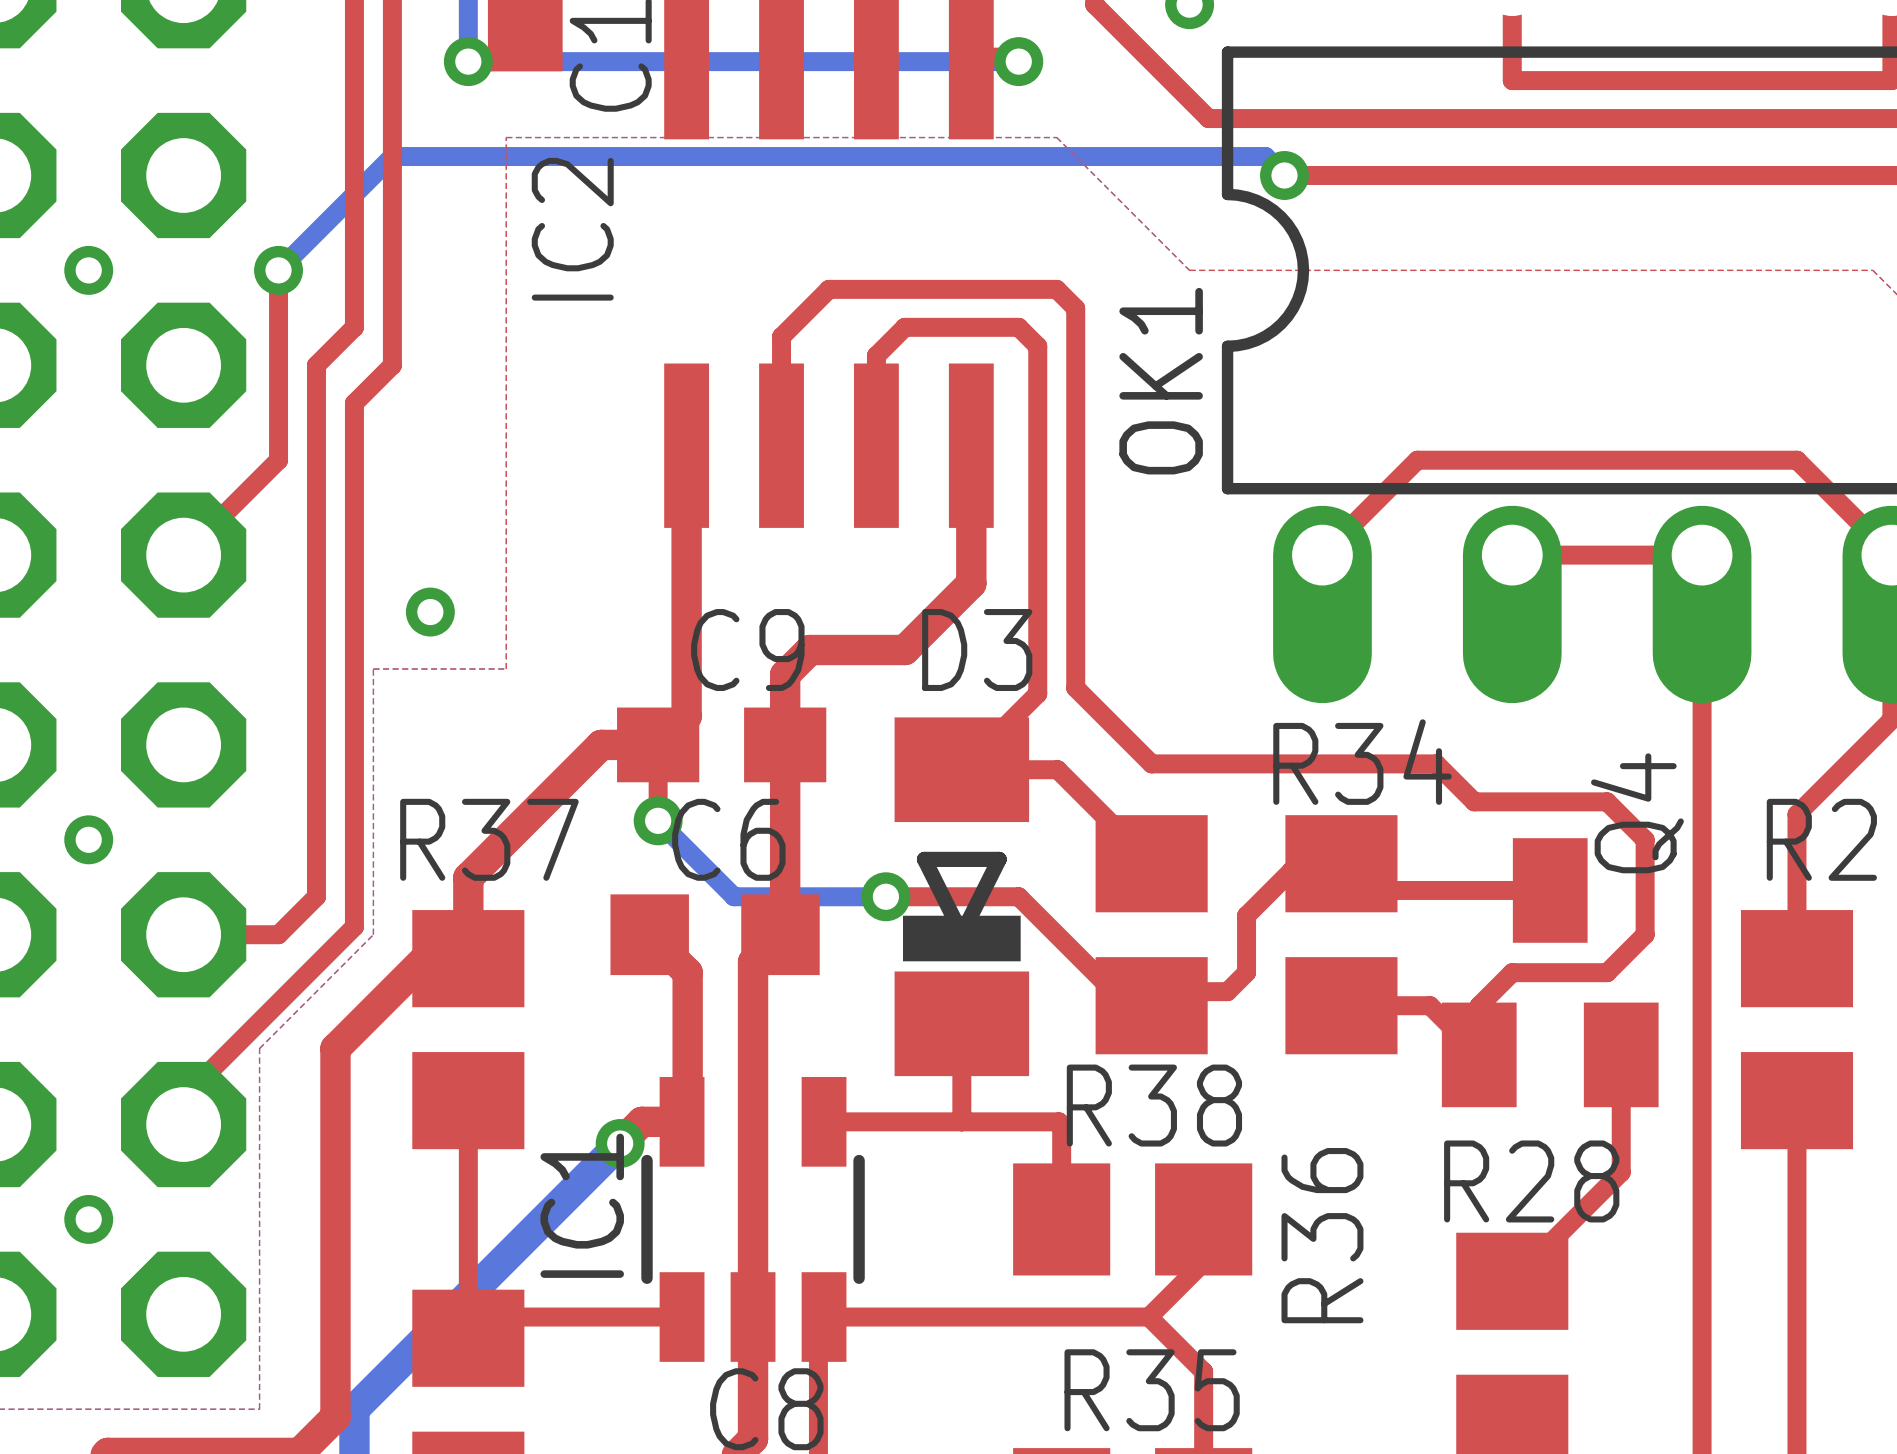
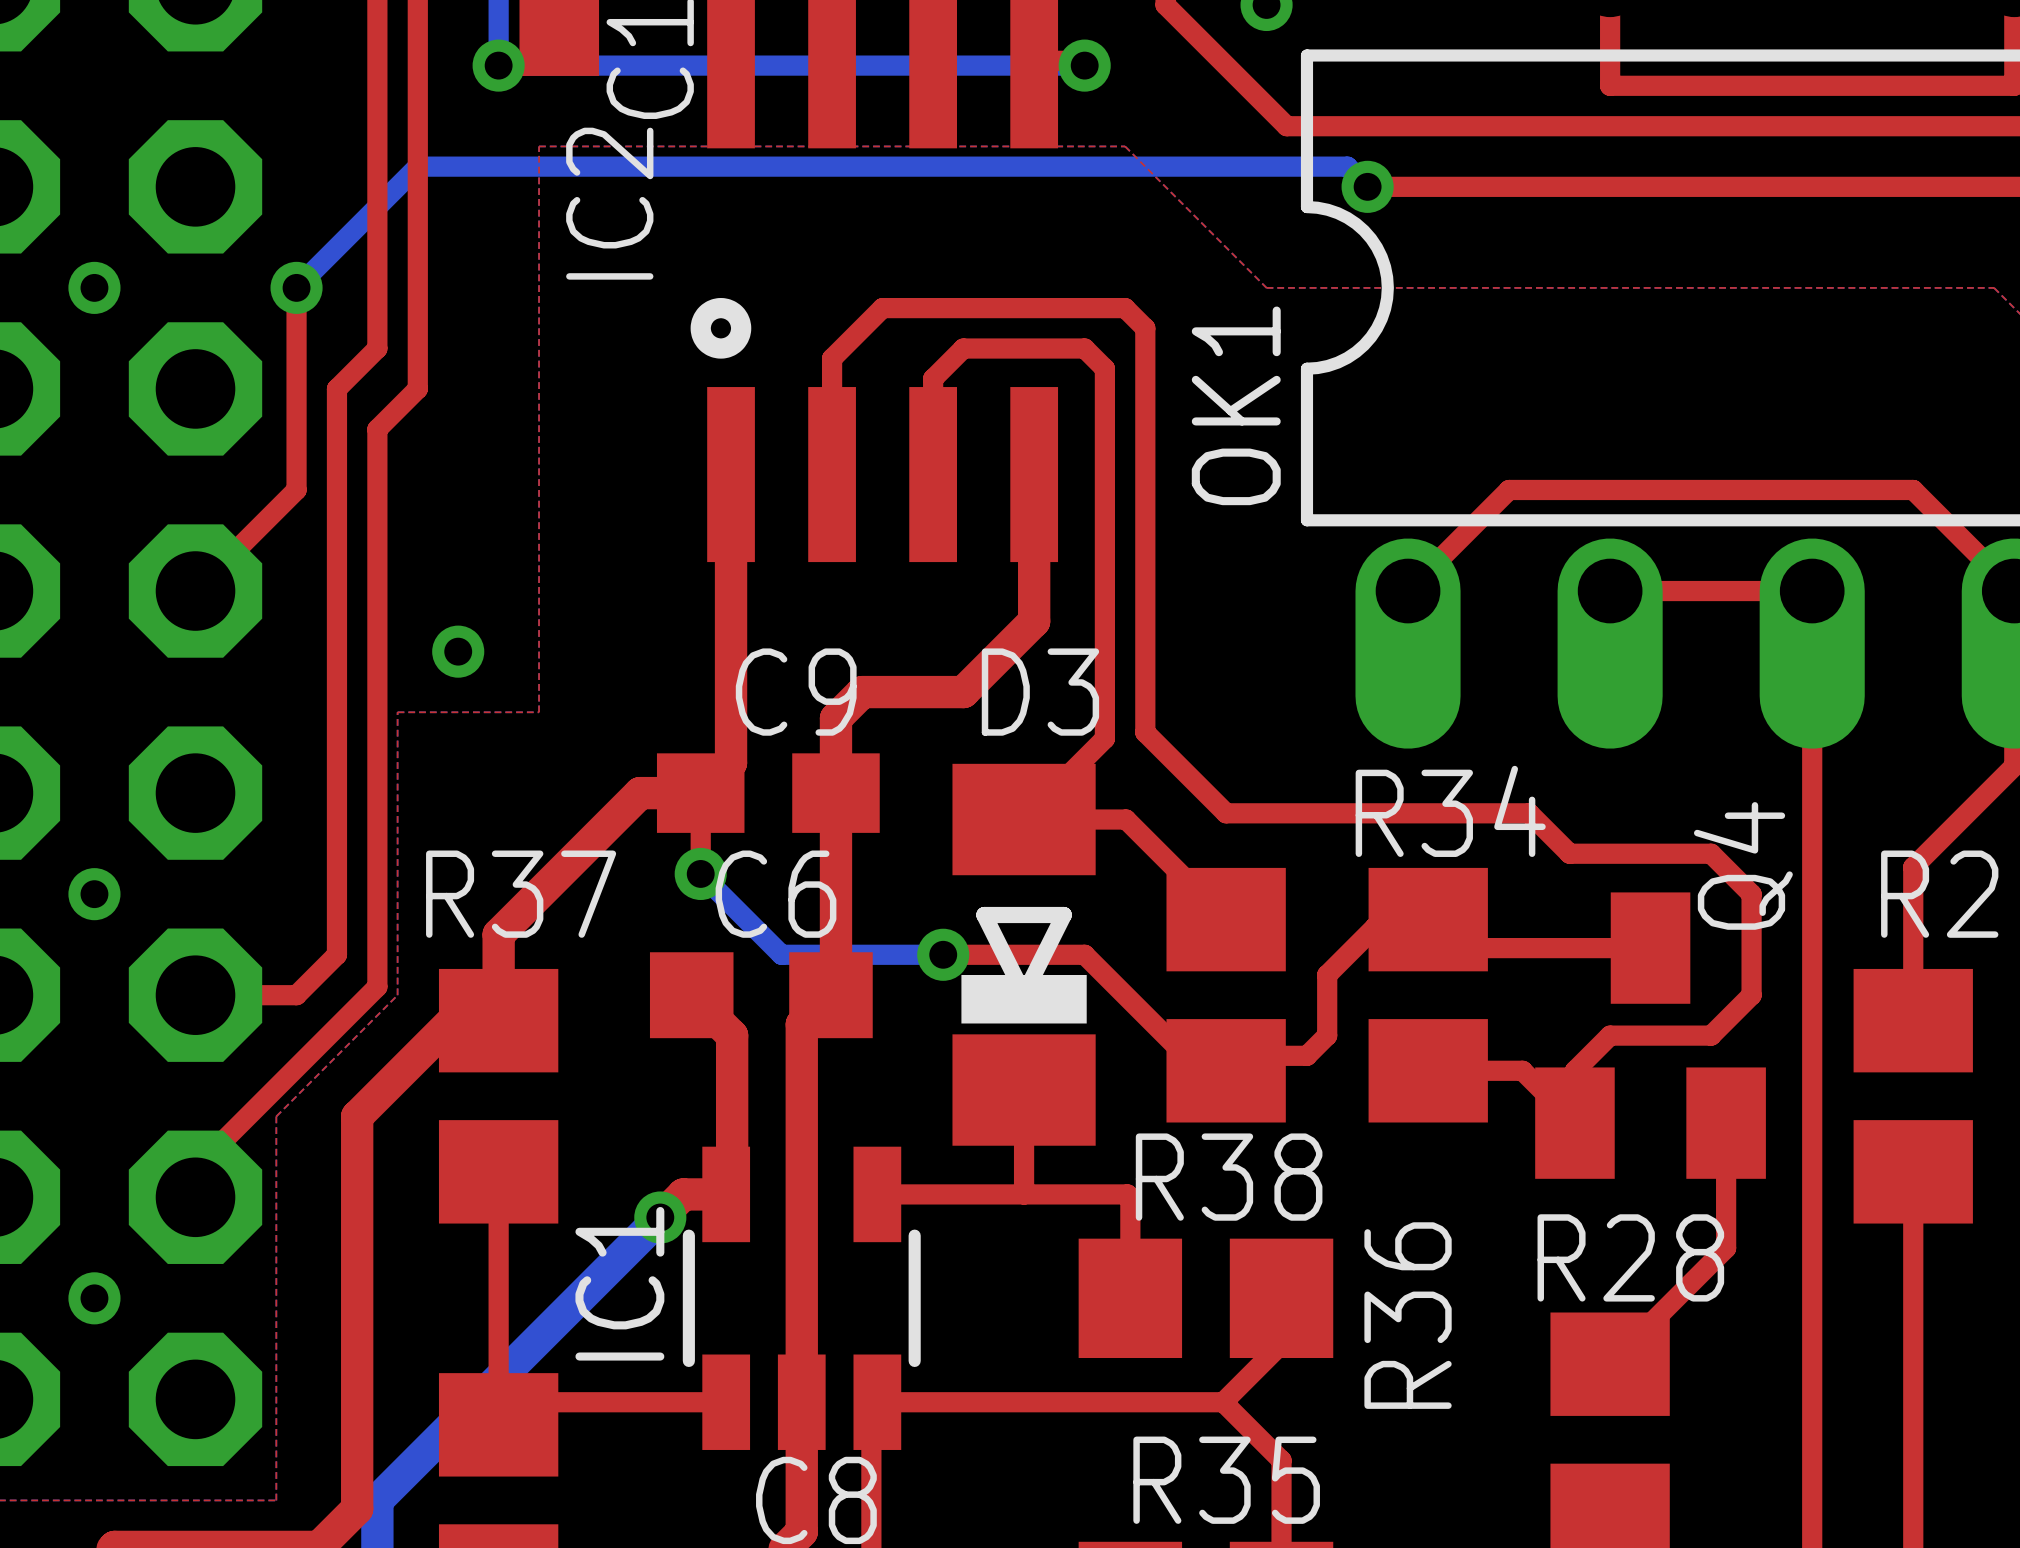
IC2 name position: IC2 (572, 229) -> IC2 (609, 203)
drawing: none -> [690, 298, 752, 359]

